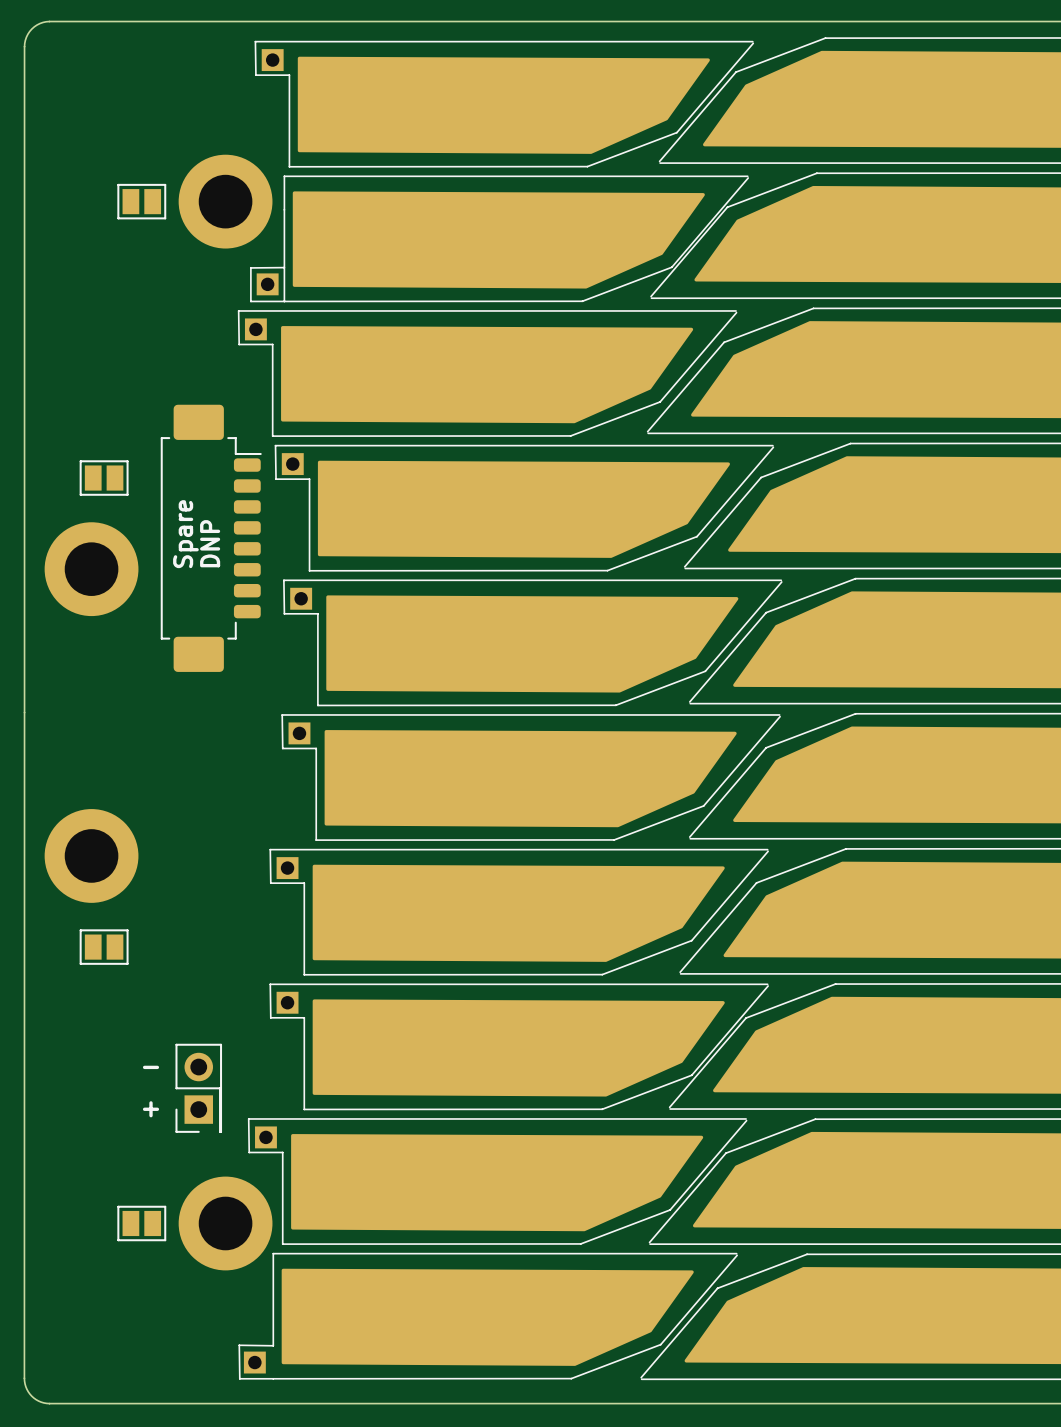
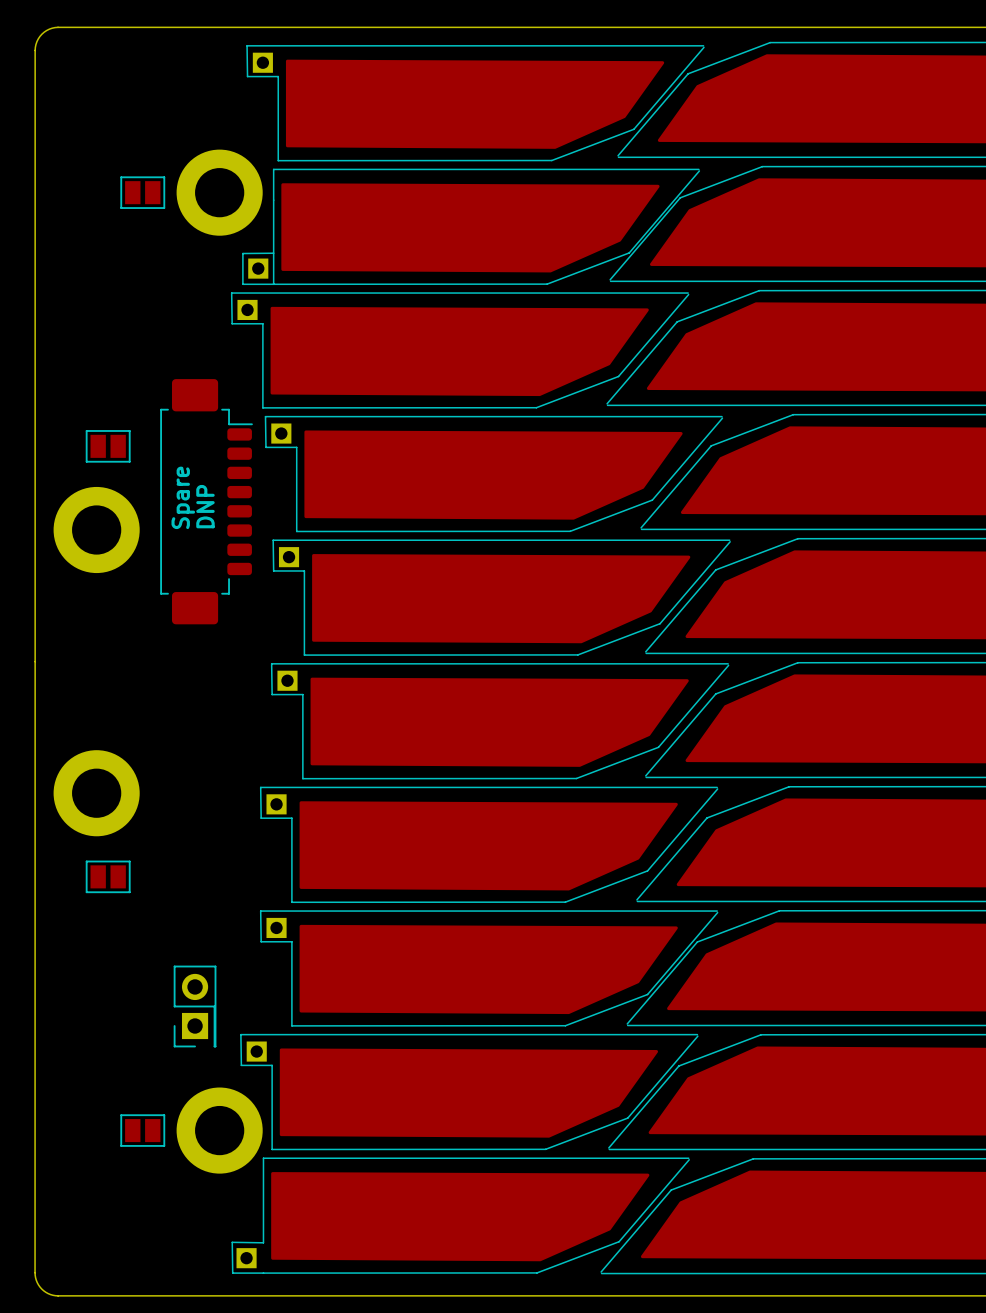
text: - (151, 1067) -> none
text: + (151, 1109) -> none

